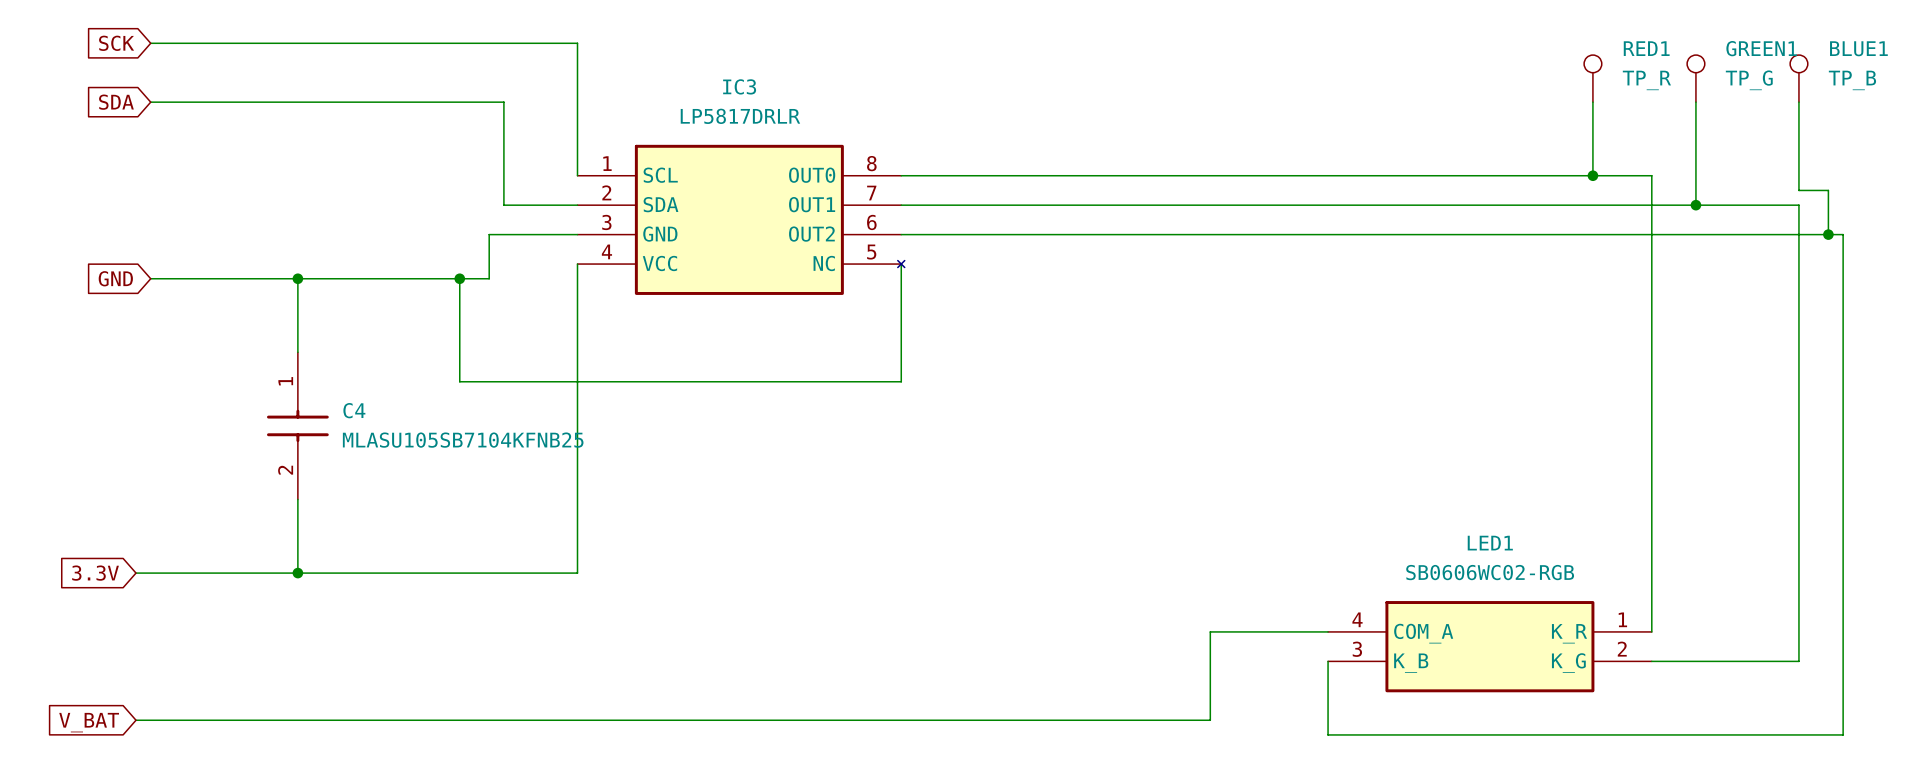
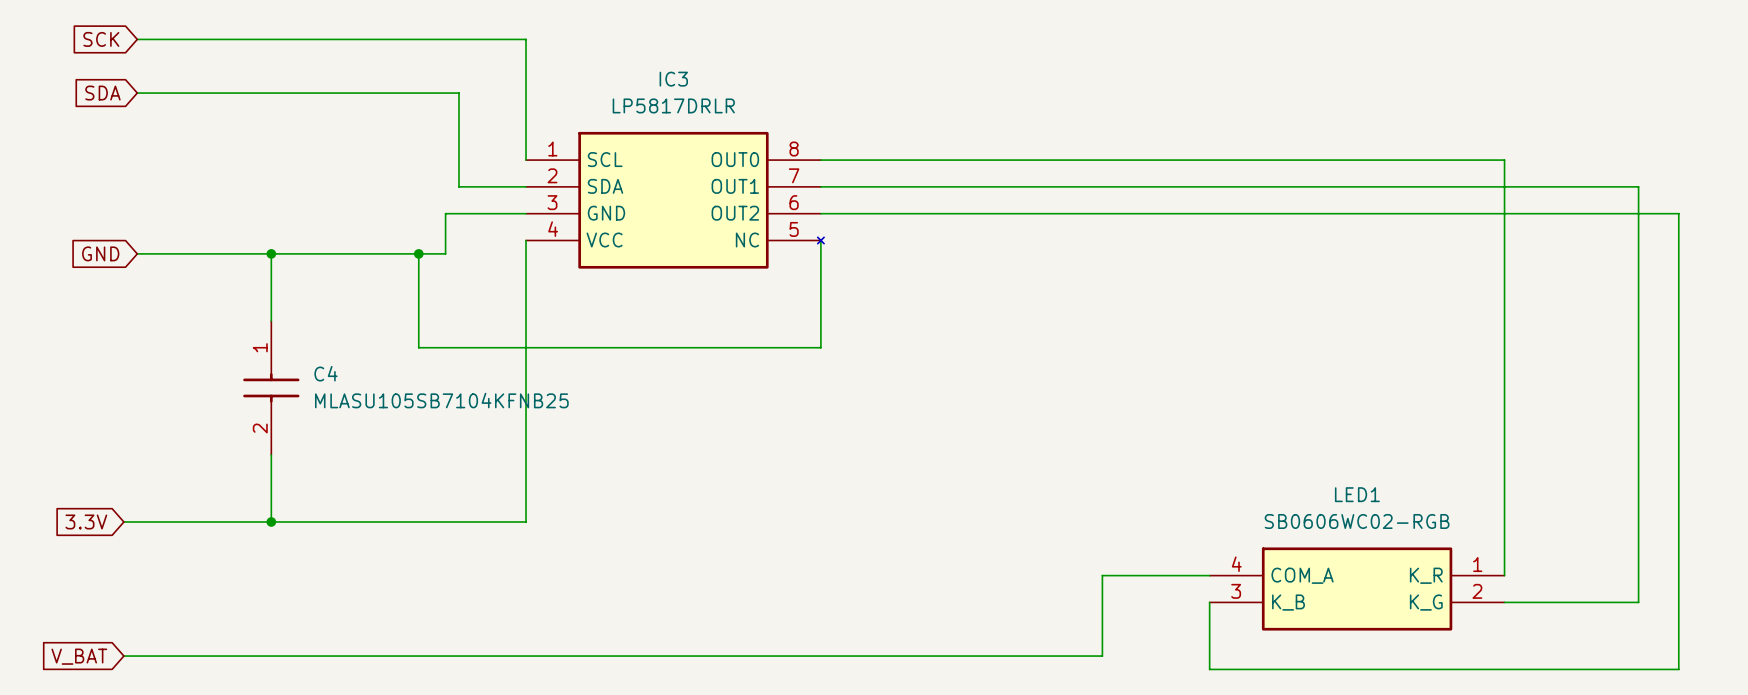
RED1: TP_R (1592, 78) -> none
GREEN1: TP_G (1695, 78) -> none
BLUE1: TP_B (1798, 78) -> none
wire: (1592, 102) (1592, 175) -> none
wire: (1695, 102) (1695, 205) -> none
wire: (1798, 102) (1798, 190) (1828, 190) (1828, 234) -> none
junction: (1592, 175) -> none
junction: (1695, 205) -> none
junction: (1828, 234) -> none

